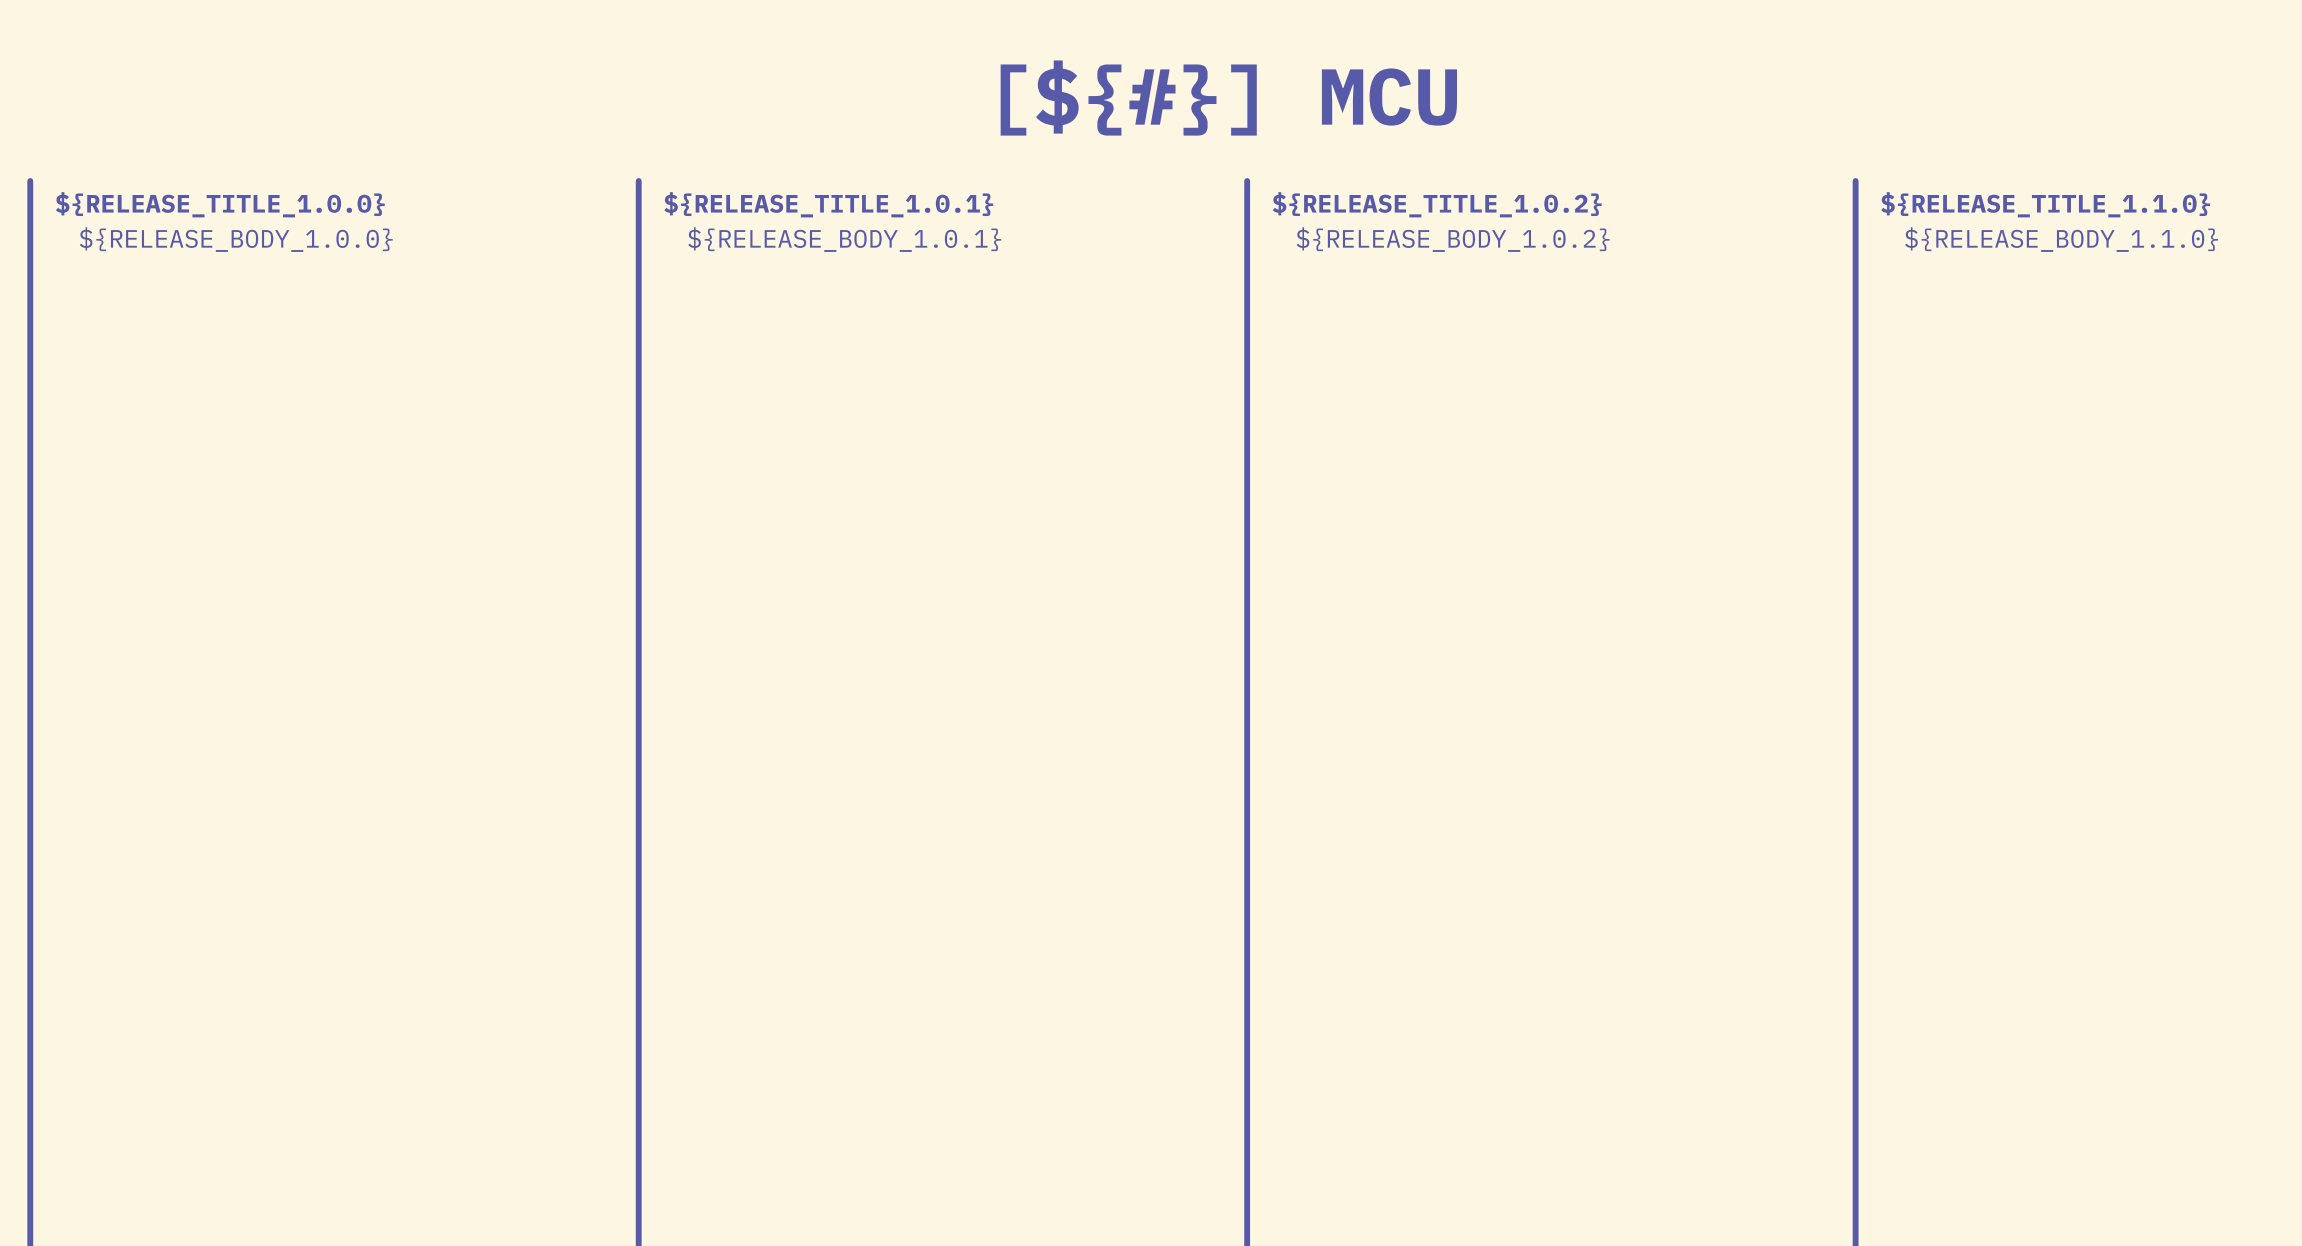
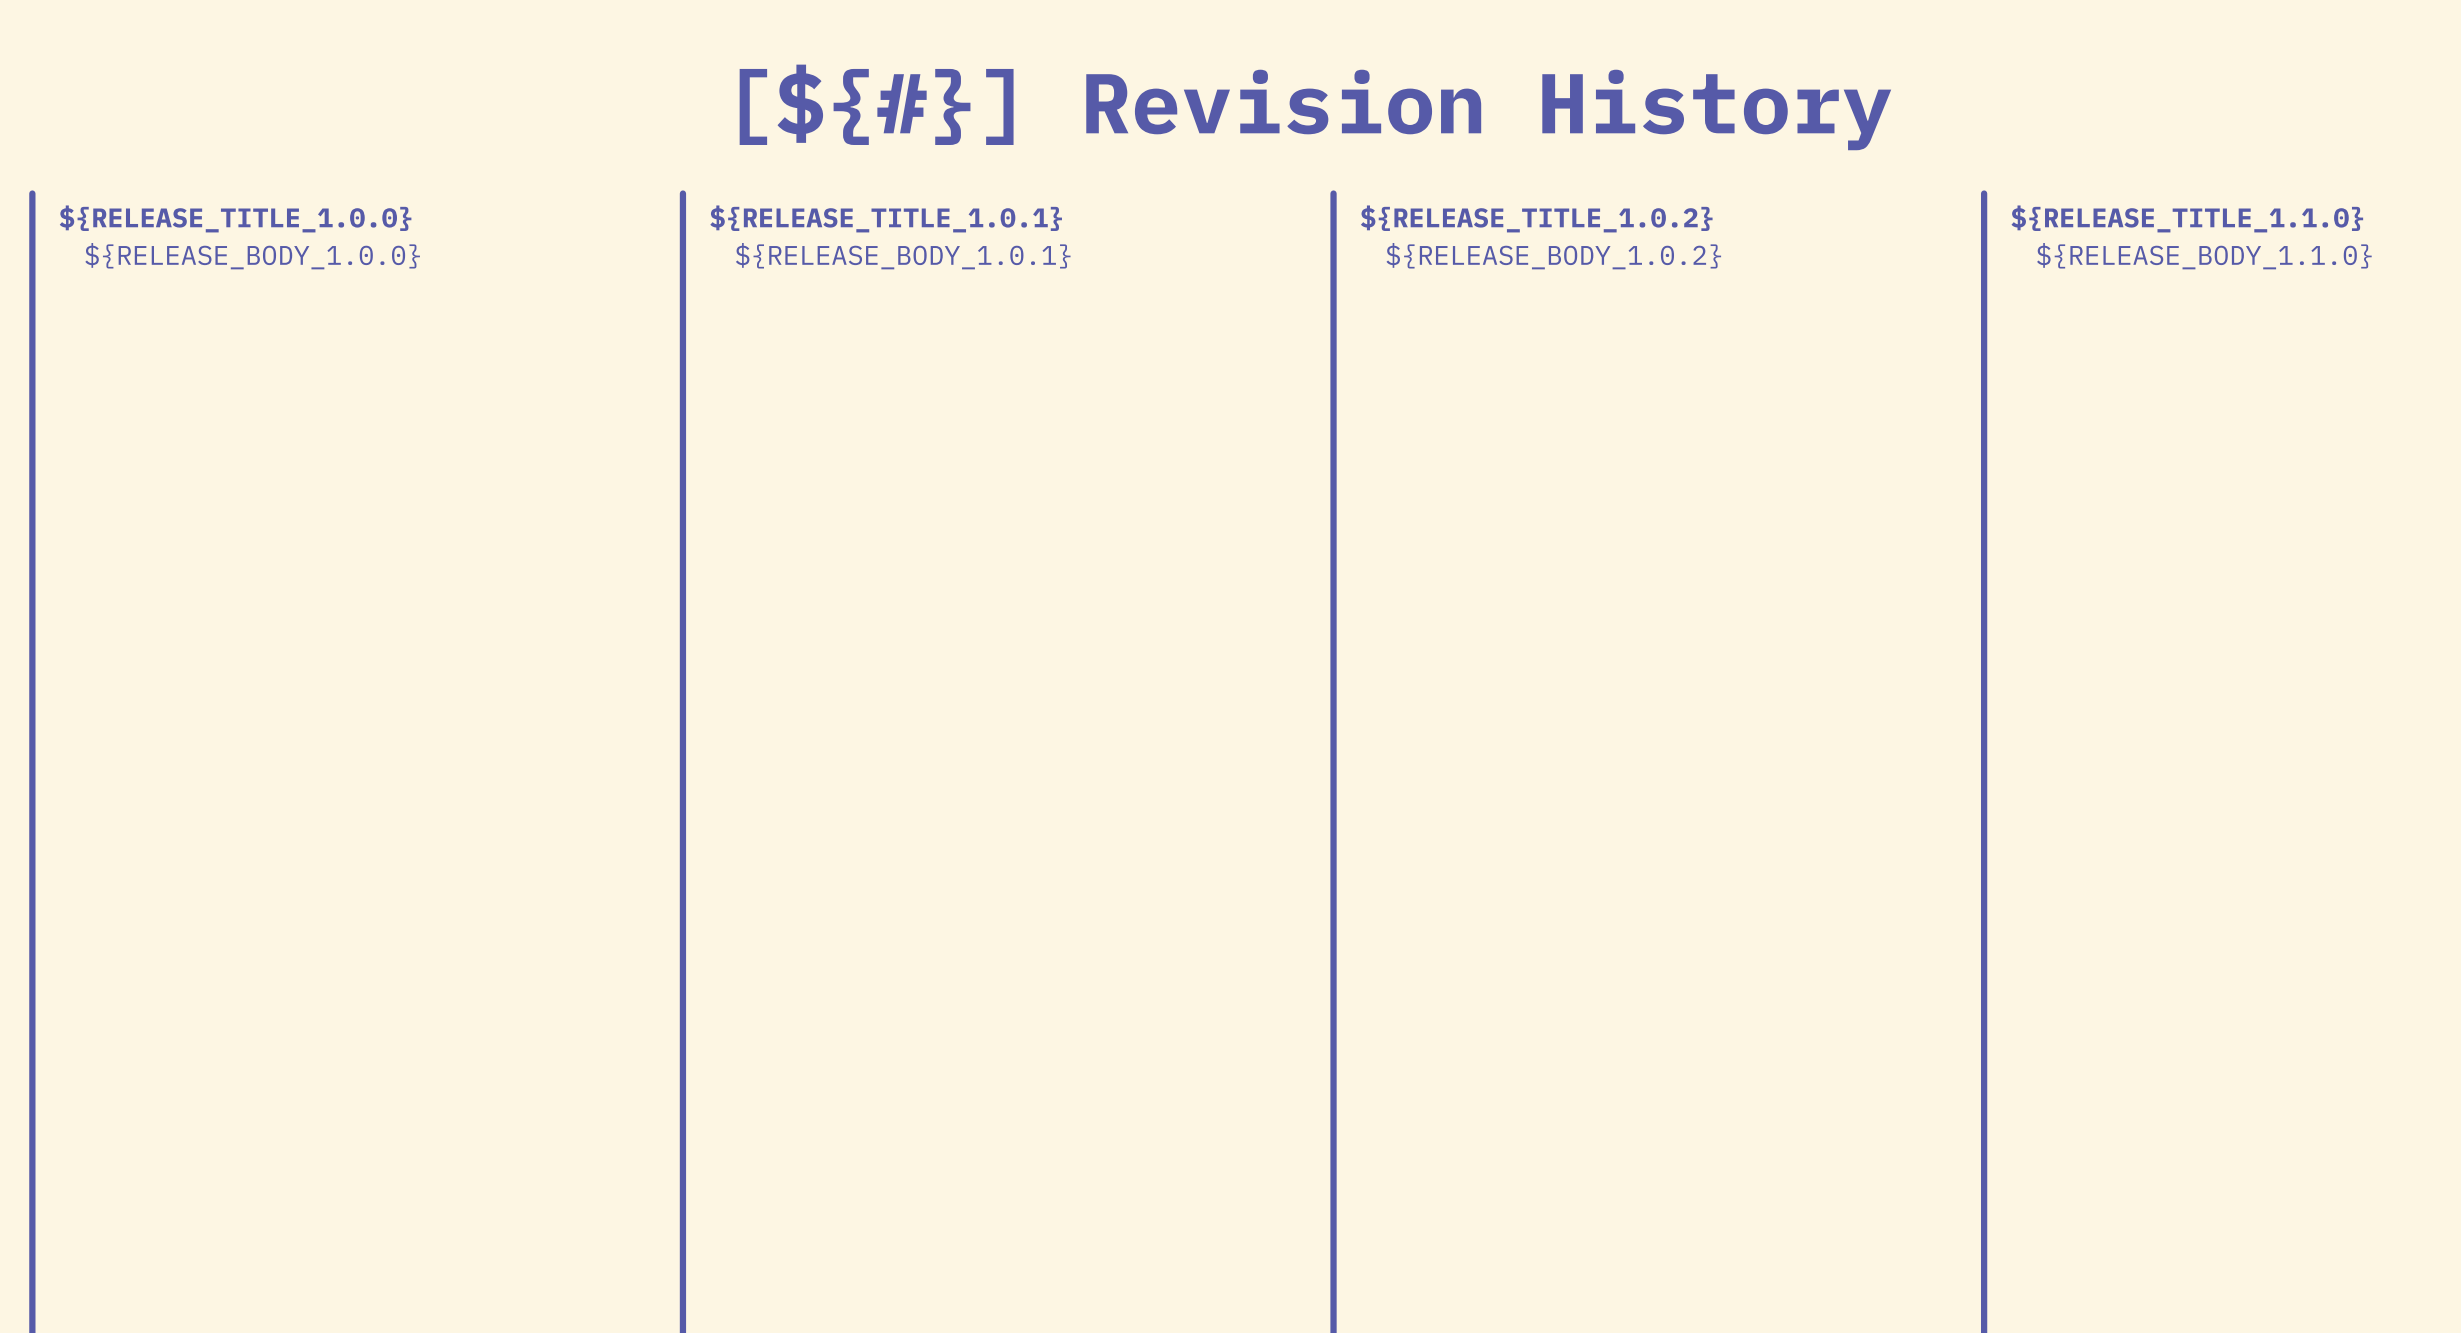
text: [${#}] MCU (1228, 98) -> [${#}] Revision History (1315, 107)

